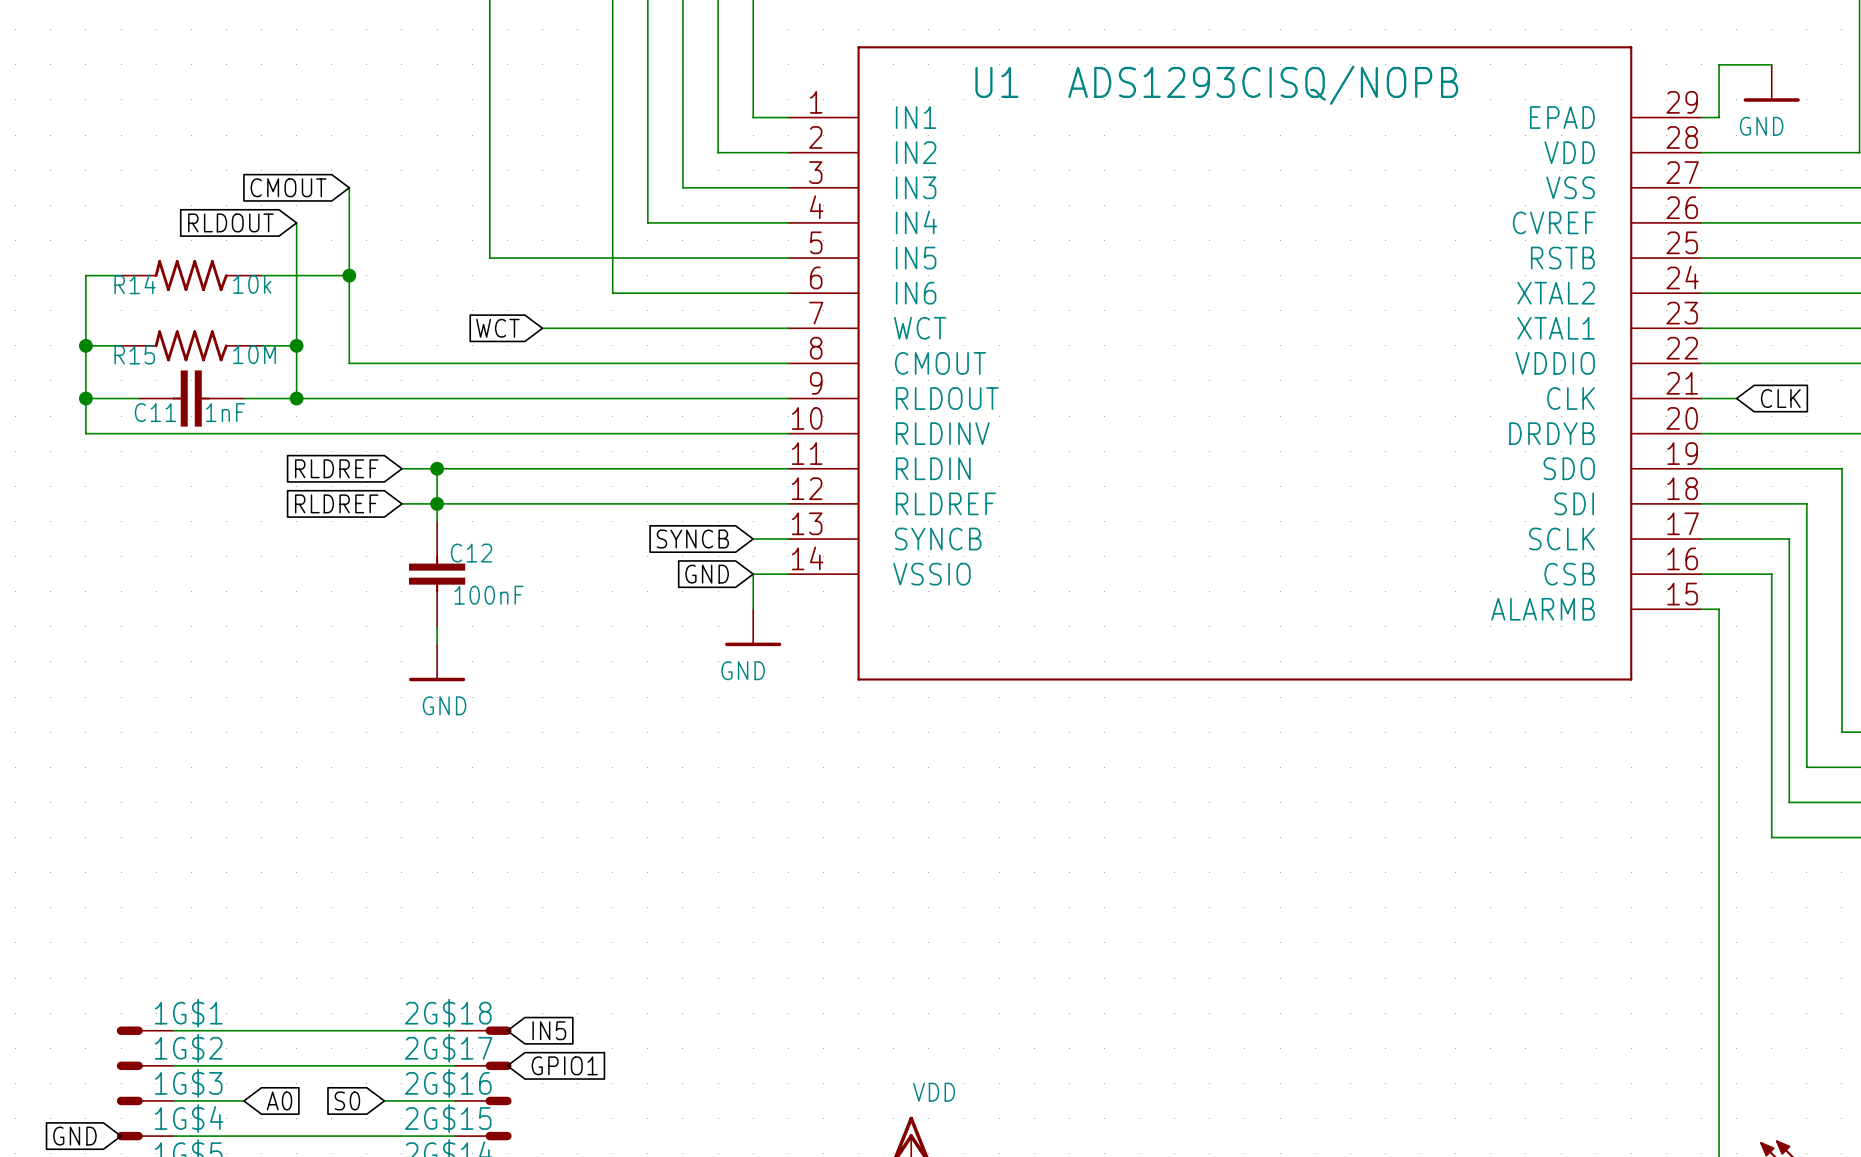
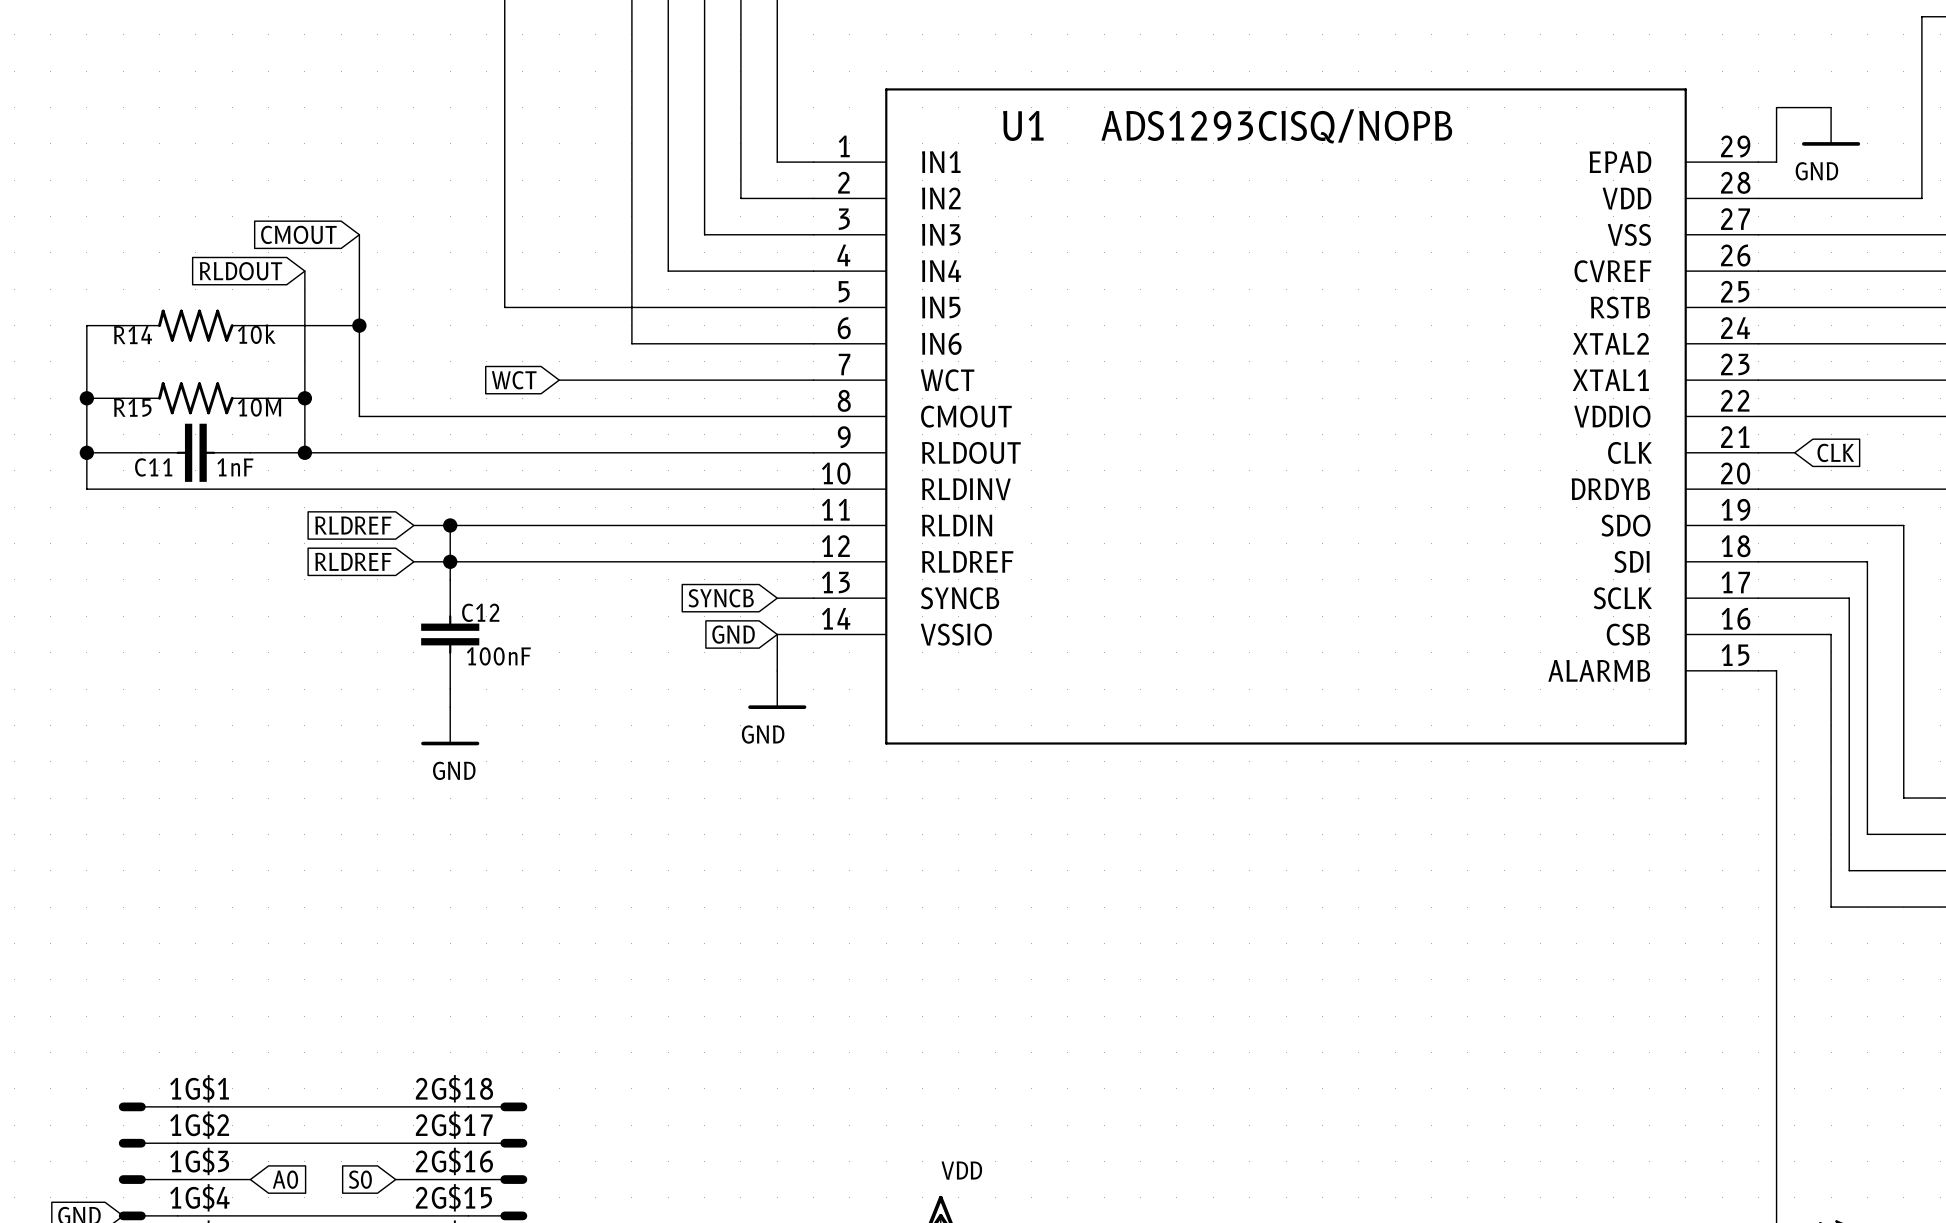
global label: IN5 (549, 1030) -> none
global label: GPIO1 (564, 1065) -> none

